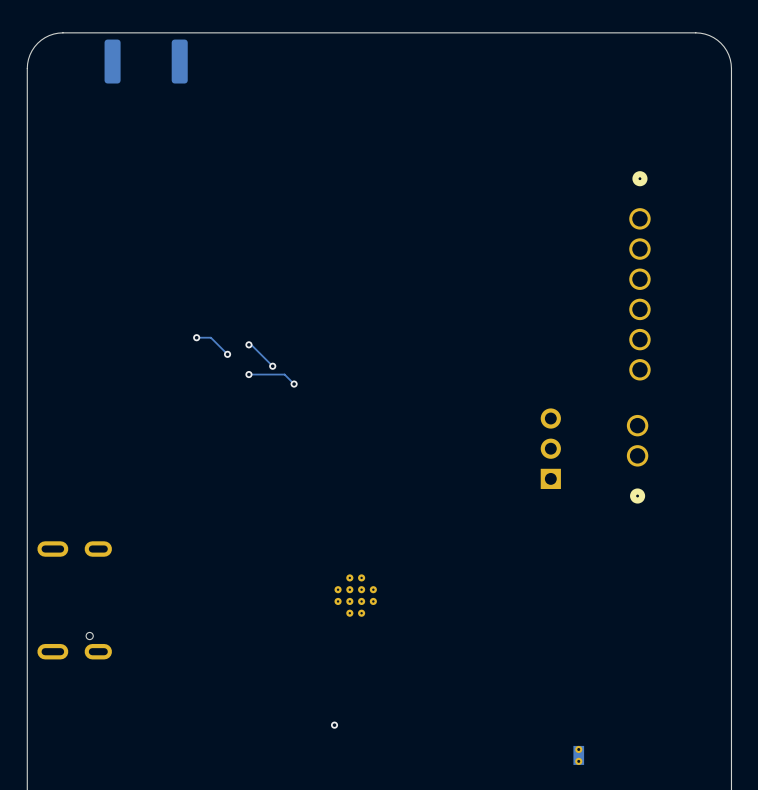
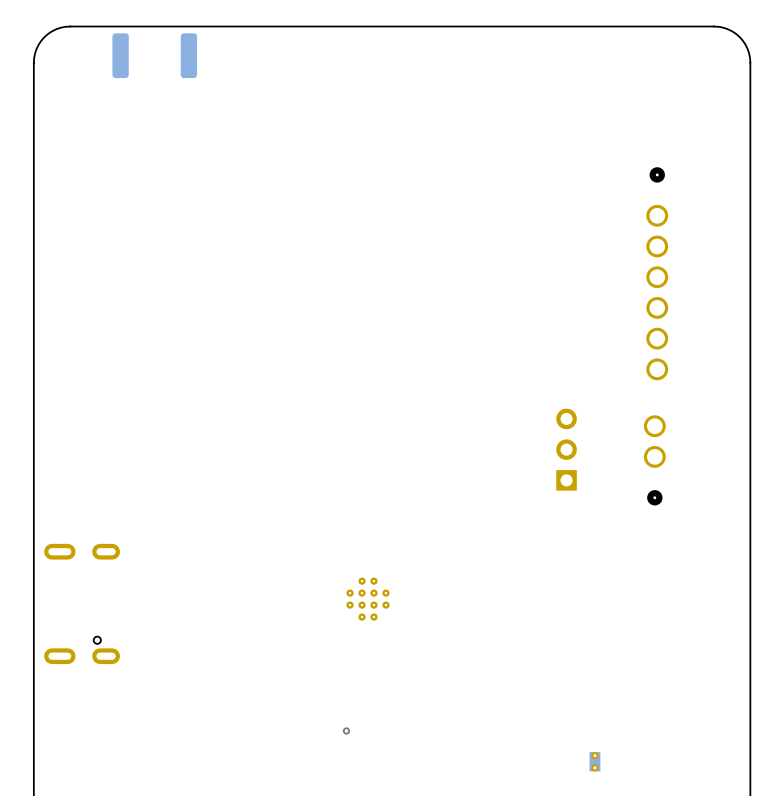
track: (196, 337) (210, 337) (227, 354) -> none
via: (196, 337) -> none
track: (248, 344) (251, 344) (272, 366) -> none
via: (248, 344) -> none
via: (227, 354) -> none
via: (272, 366) -> none
track: (248, 374) (284, 374) (294, 384) -> none
via: (248, 374) -> none
via: (294, 384) -> none

